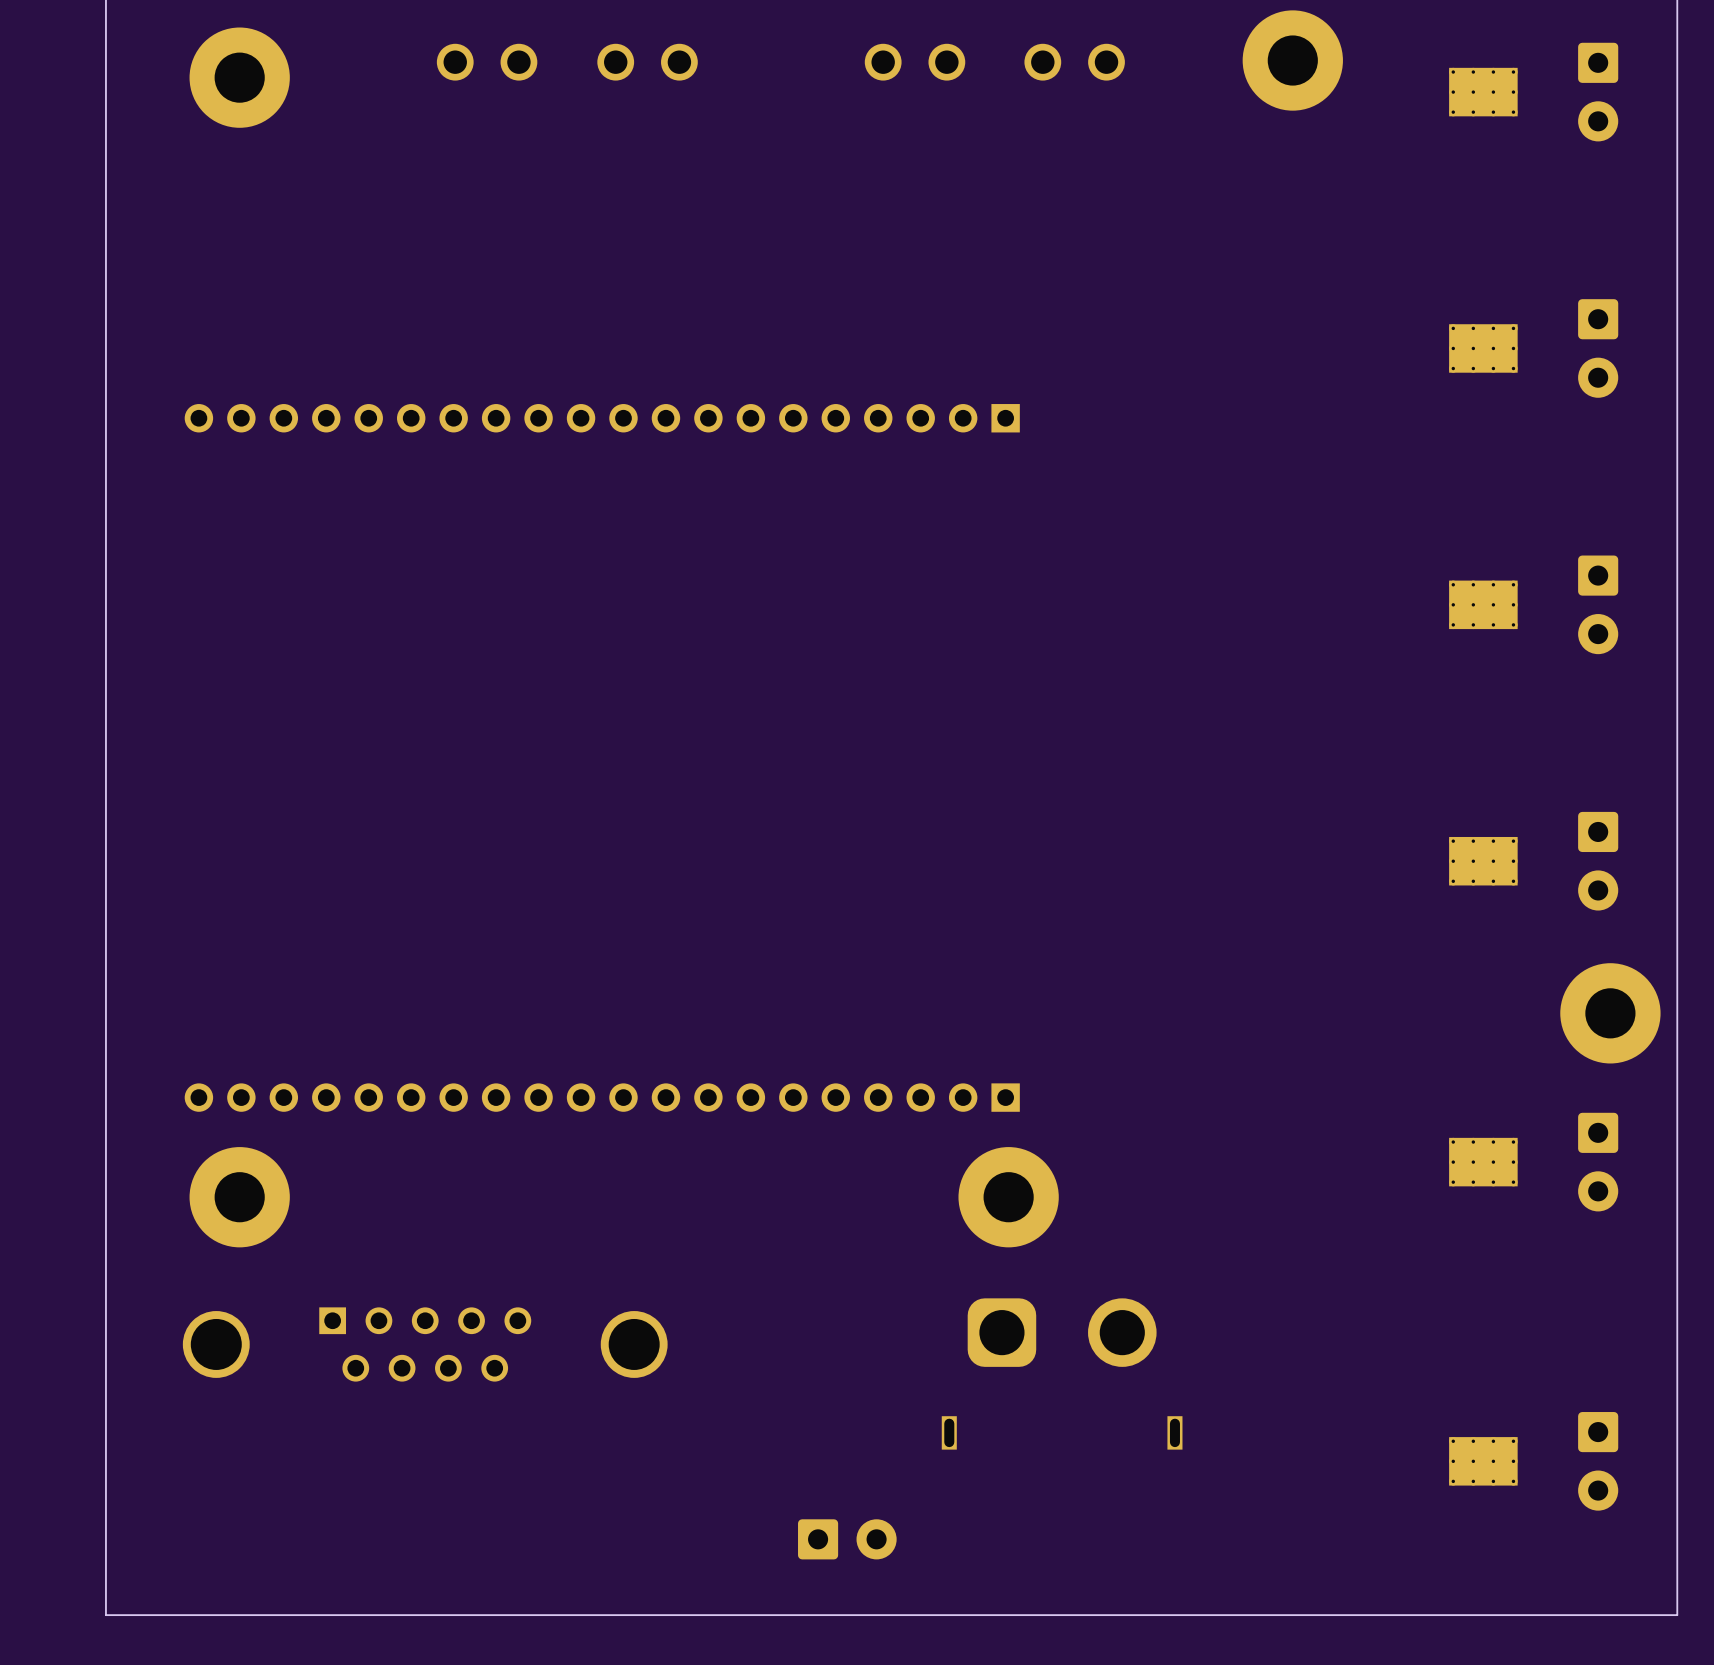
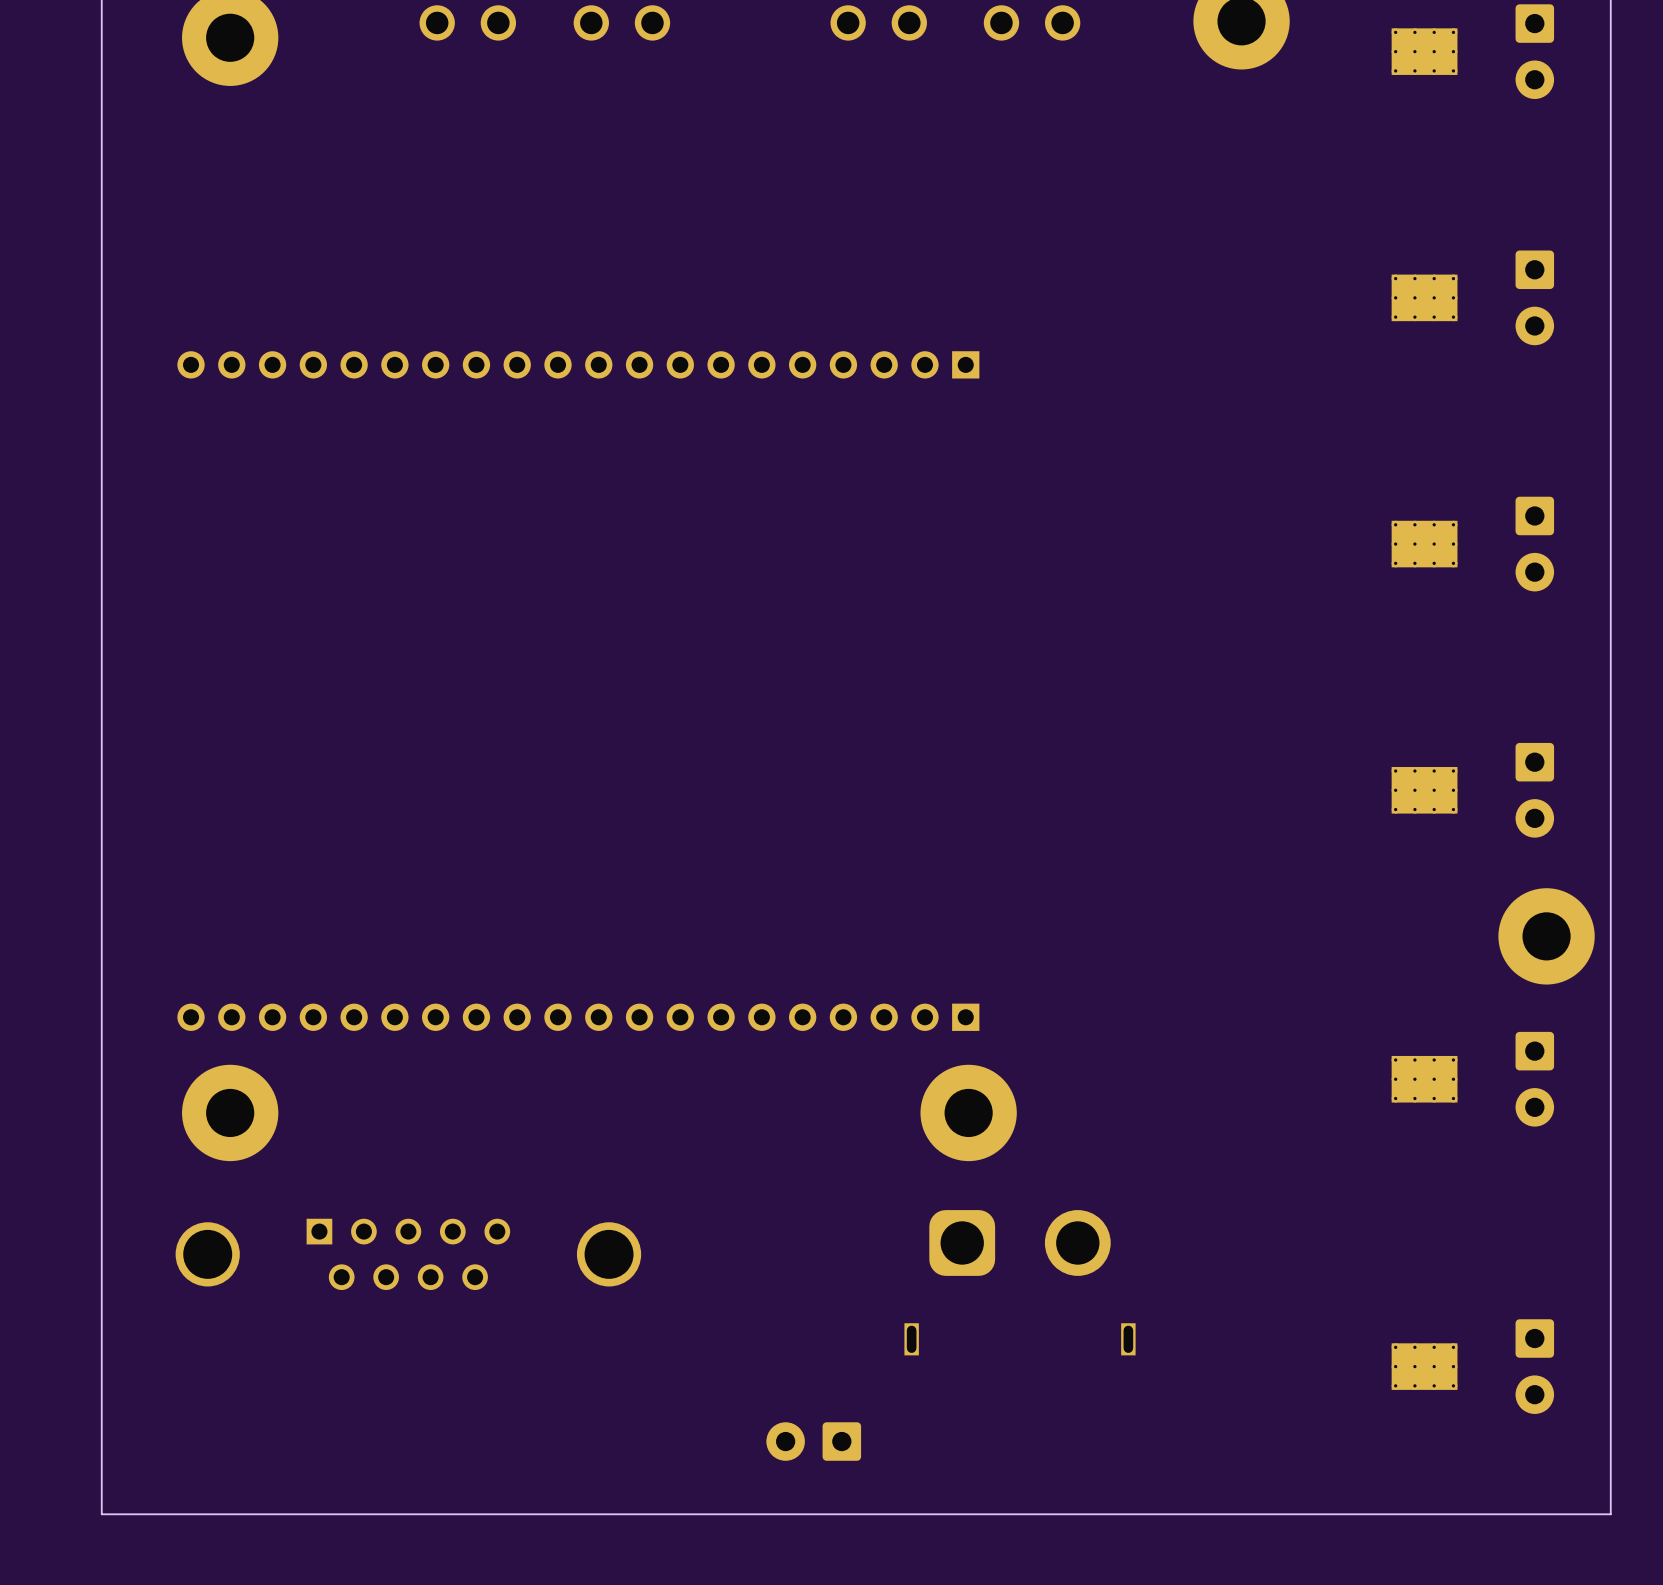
part rotation: 0° (847, 1539) -> 180° (813, 1441)

